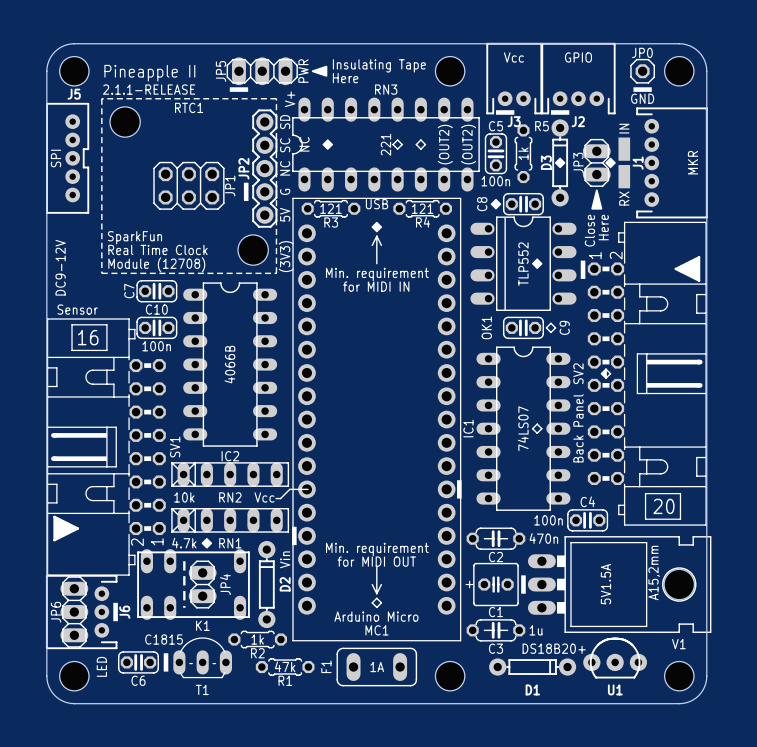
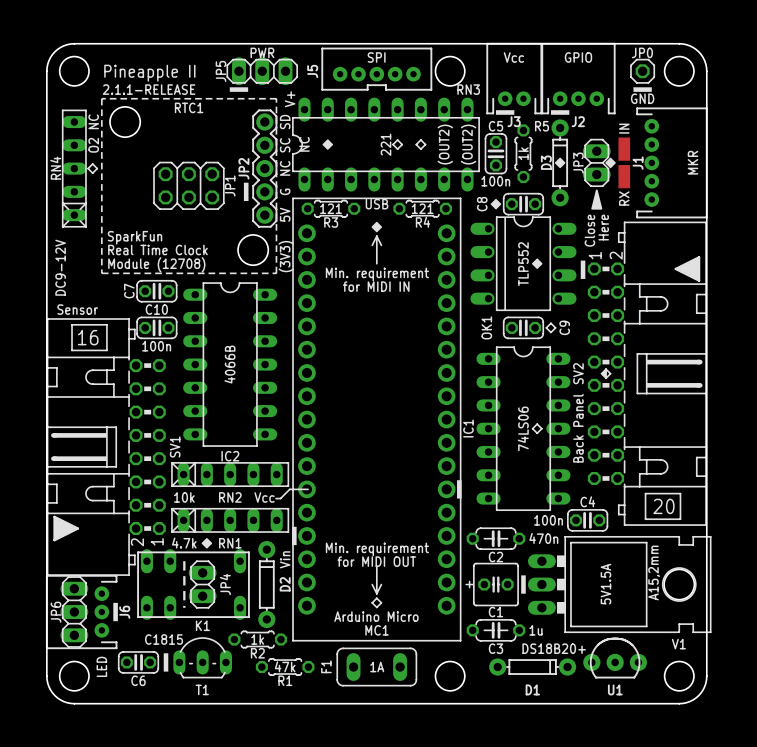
text: none -> SPI (376, 57)
drawing: [311, 65, 328, 77] -> none
text: Insulating Tape (379, 65) -> none
text rotation: 0° (303, 71) -> 90° clockwise (262, 52)
text position: PWR (303, 71) -> PWR (262, 52)
text: Here (345, 78) -> none
RN3 name position: RN3 (386, 89) -> RN3 (468, 89)
J5 name position: J5 (74, 94) -> J5 (312, 71)
text: none -> NC (93, 121)
text: none -> O2 (93, 145)
text: SPI (56, 158) -> none
J5 rotation: 0° (67, 158) -> 90° clockwise (376, 69)
J5 position: (67, 158) -> (376, 69)
line: none -> (92, 164) (88, 168) (92, 173) (97, 168) (92, 164)
RN4: none -> (74, 168)
text: 74LS07 (523, 428) -> 74LS06 (523, 428)

